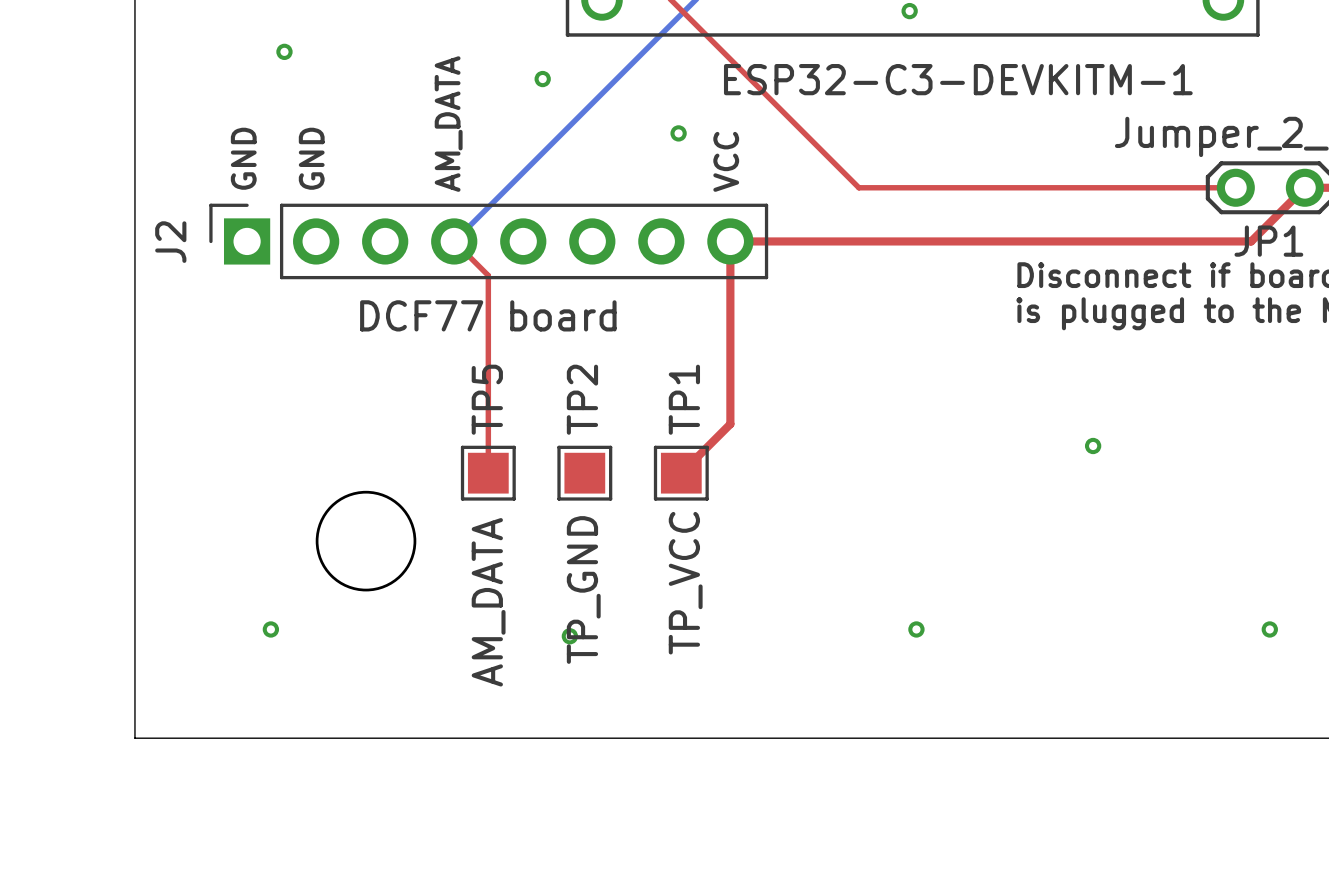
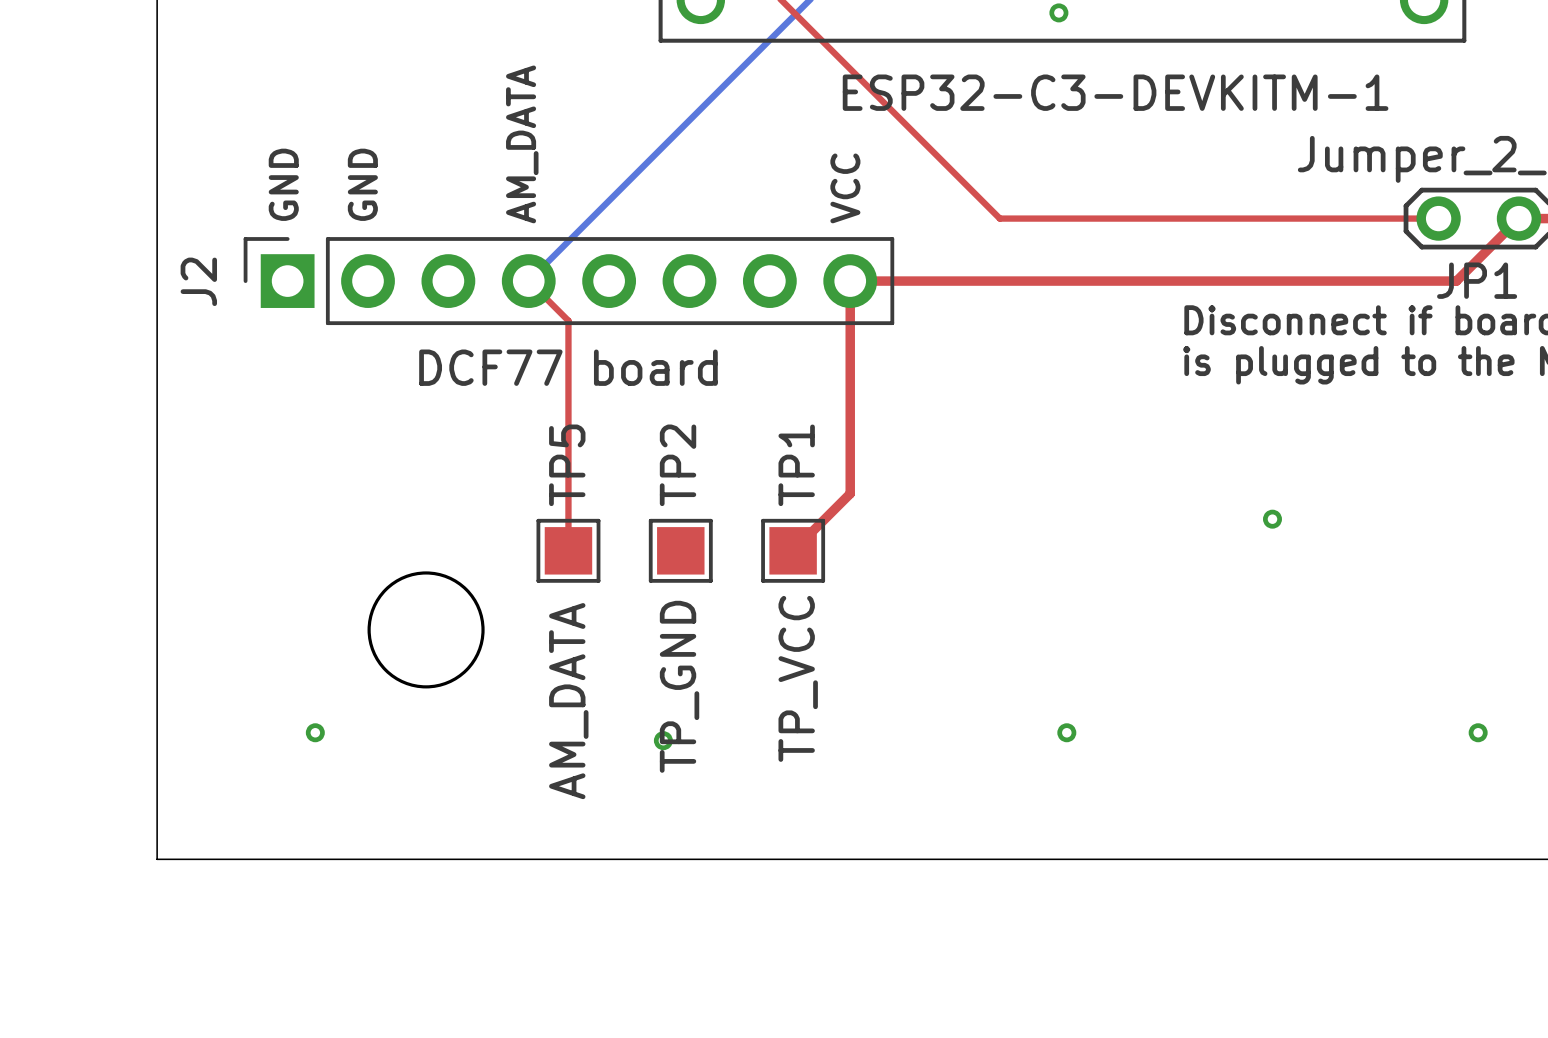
via: (284, 51) -> none
via: (542, 79) -> none
via: (678, 133) -> none

